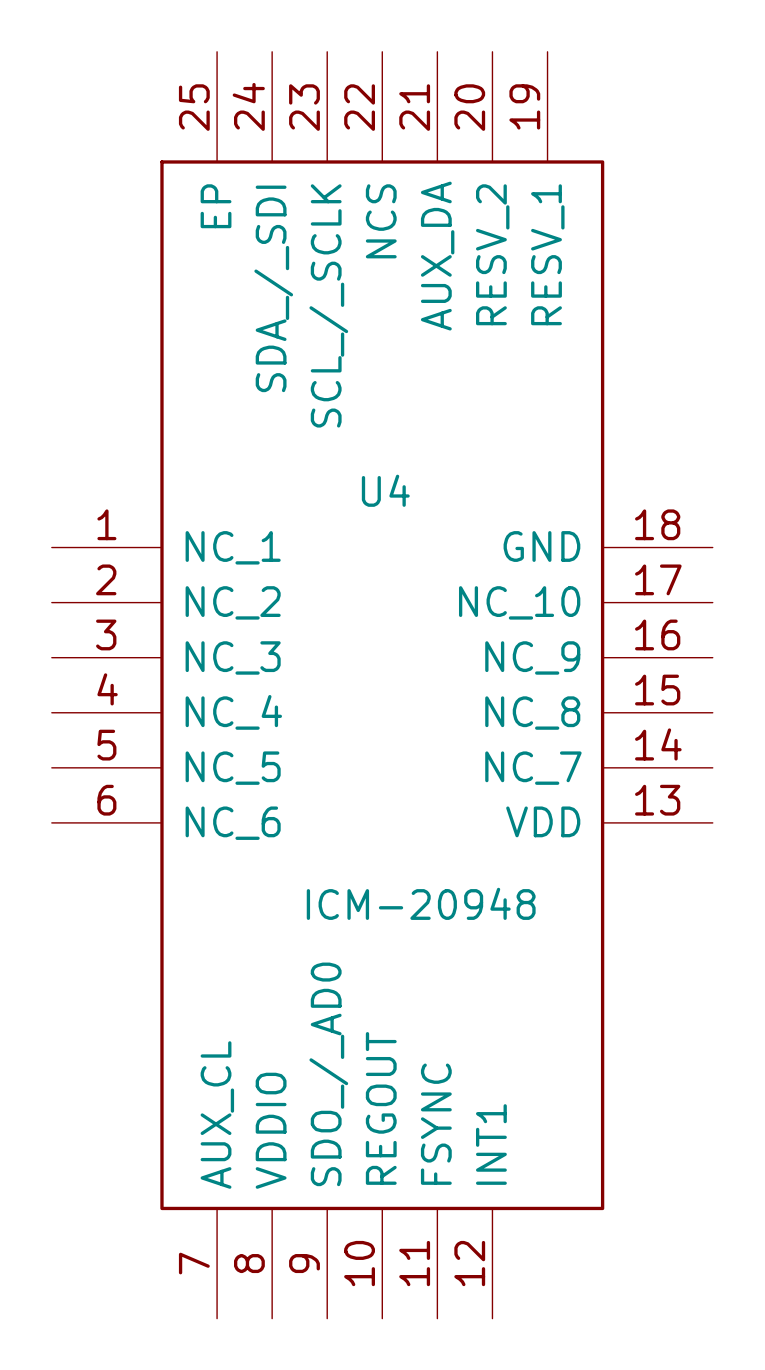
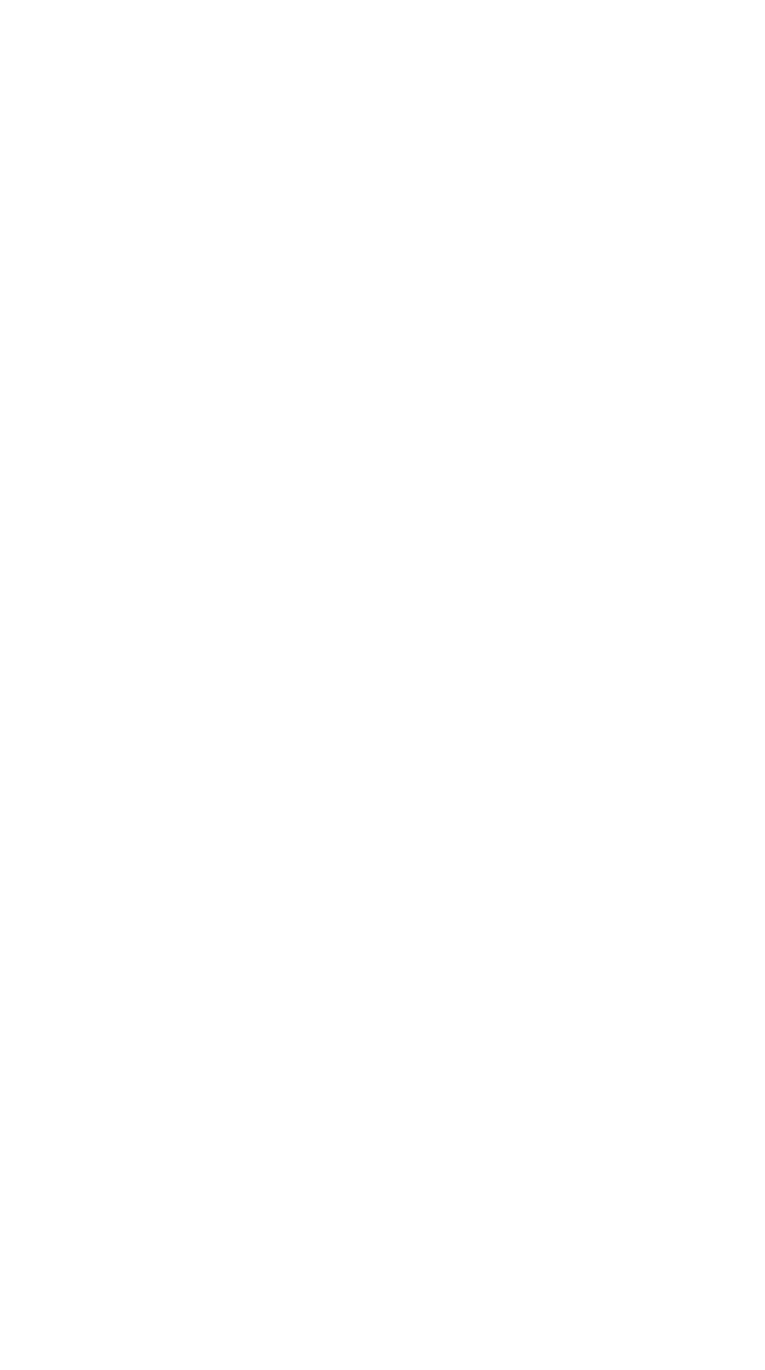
U4: ICM-20948 (382, 685) -> none

